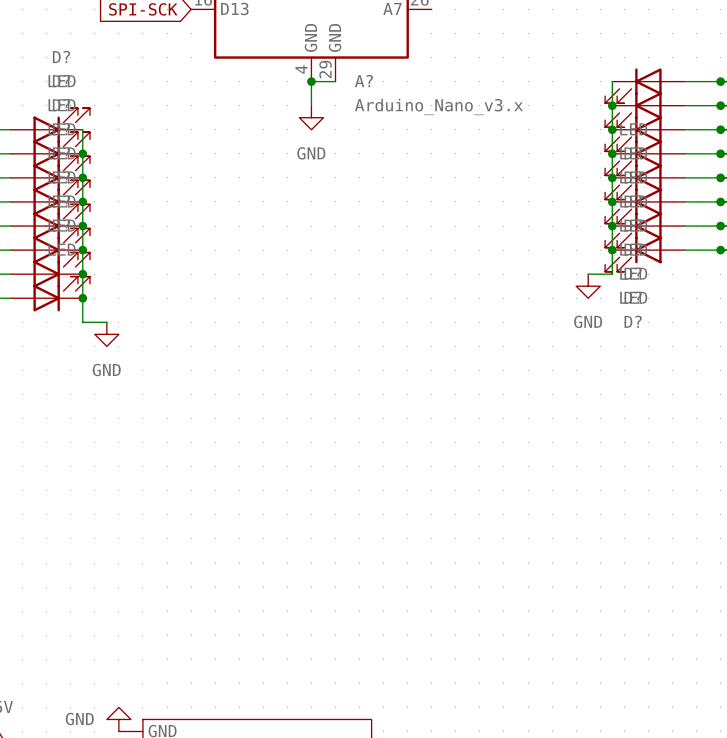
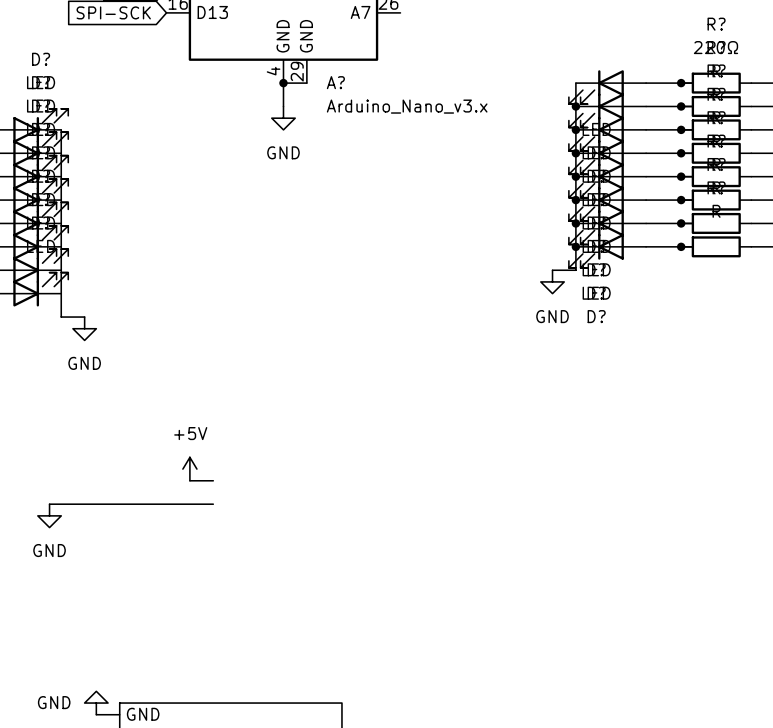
junction: (82, 153) -> none
junction: (82, 177) -> none
junction: (82, 201) -> none
junction: (82, 226) -> none
junction: (82, 250) -> none
junction: (82, 274) -> none
junction: (82, 298) -> none
power symbol: none -> +5V (189, 469)
wire: none -> (189, 480) (213, 480)
wire: none -> (49, 504) (213, 504)
power symbol: none -> GND (49, 515)

